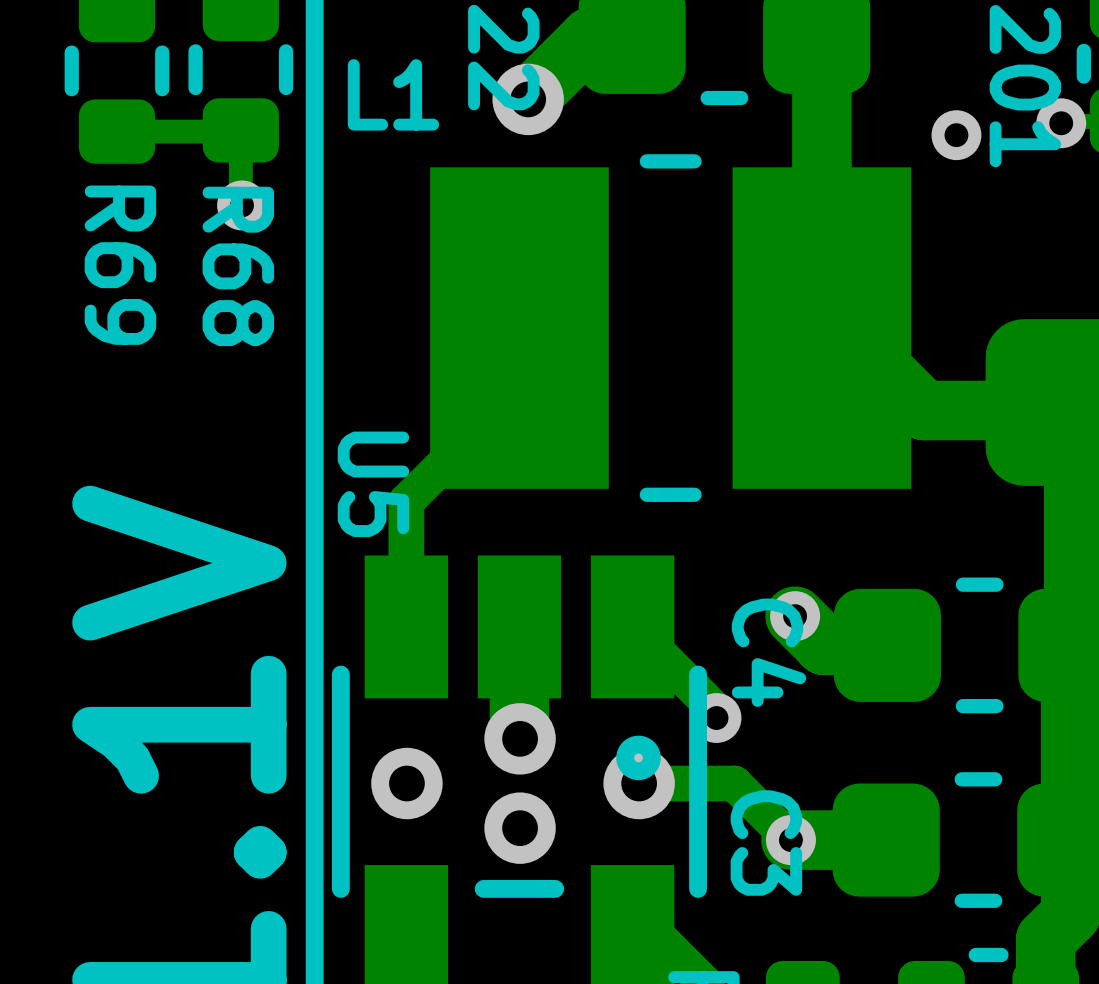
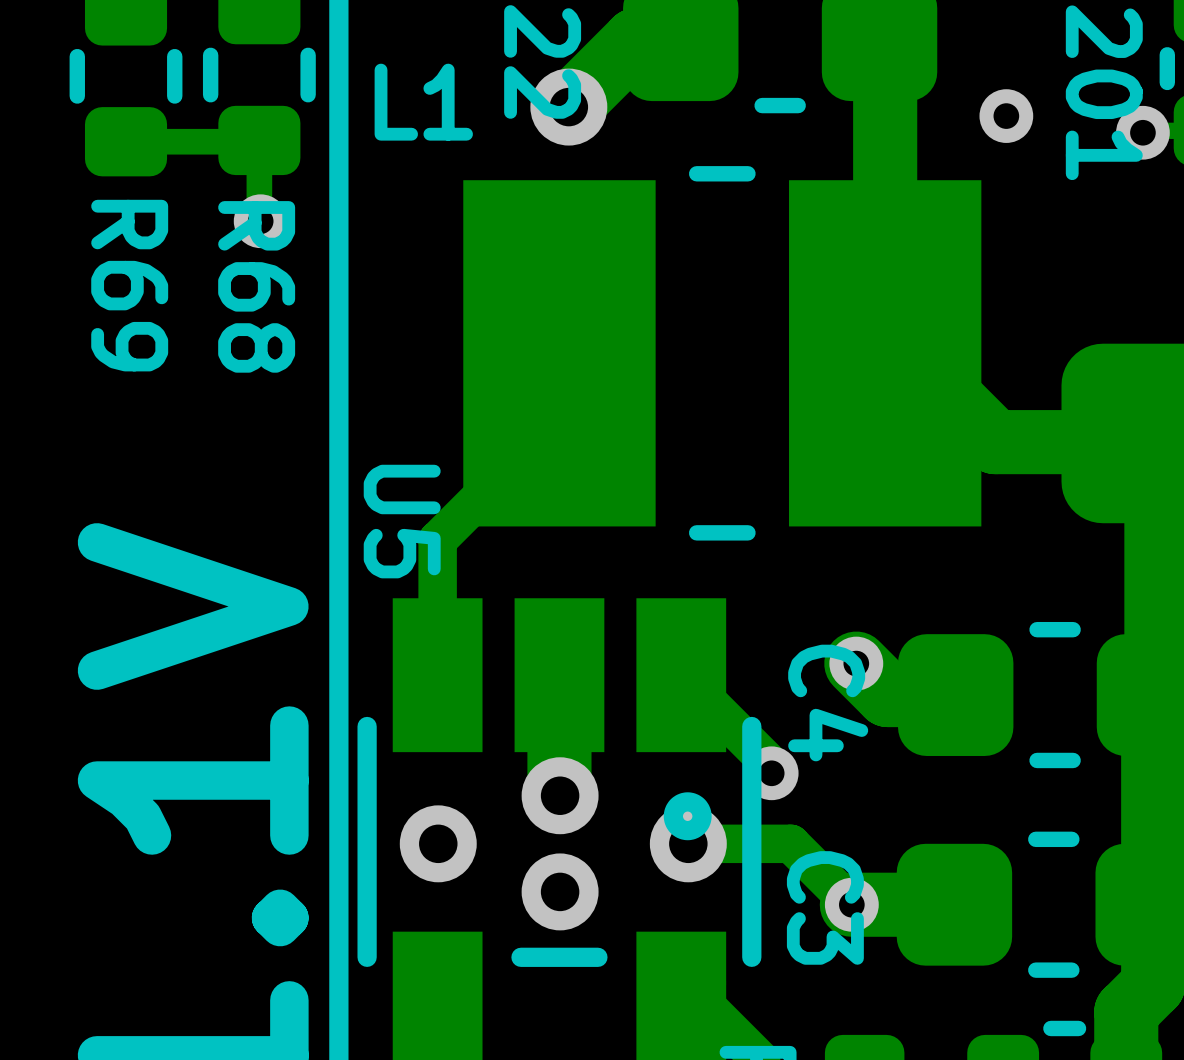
via position: (956, 135) -> (1006, 116)

